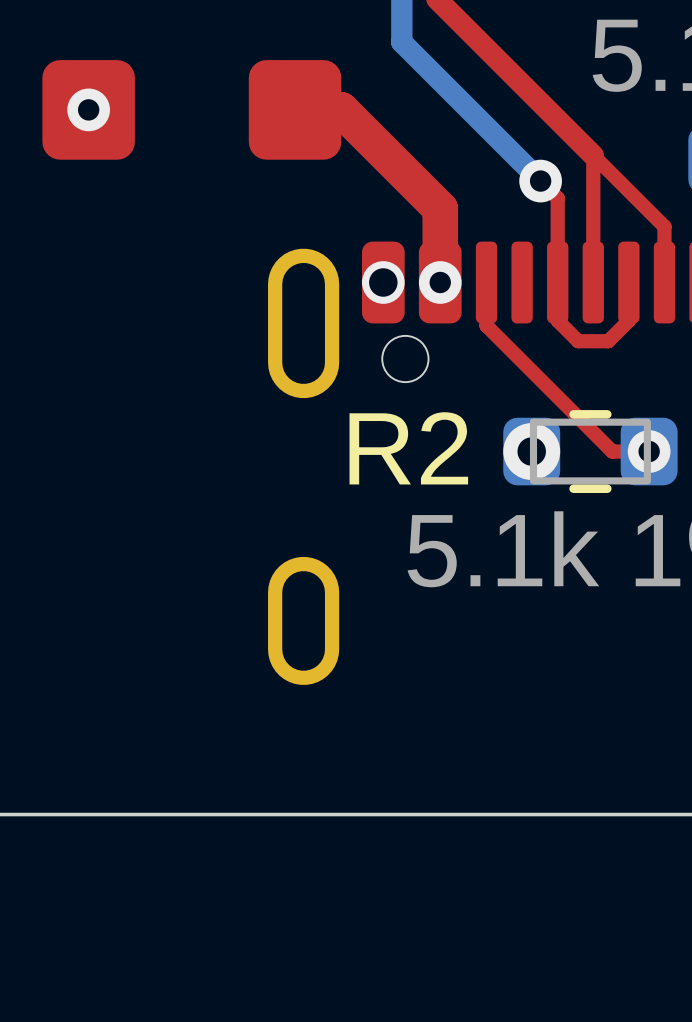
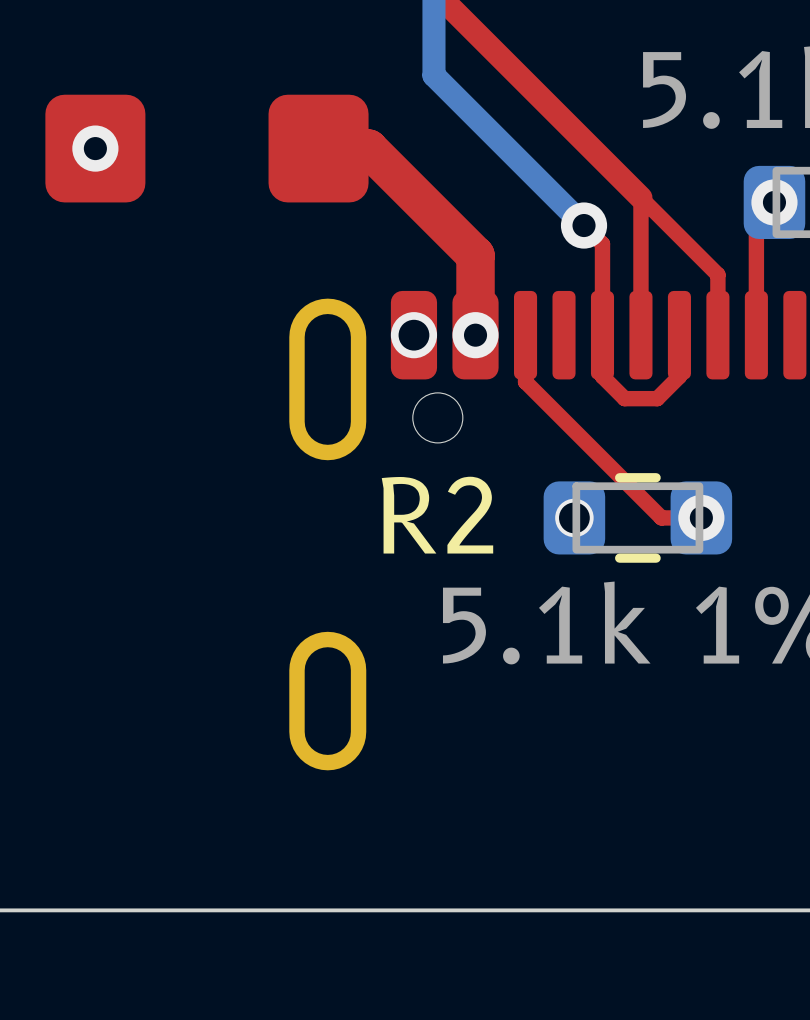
via size: [503, 423, 561, 481] -> [555, 498, 594, 538]

